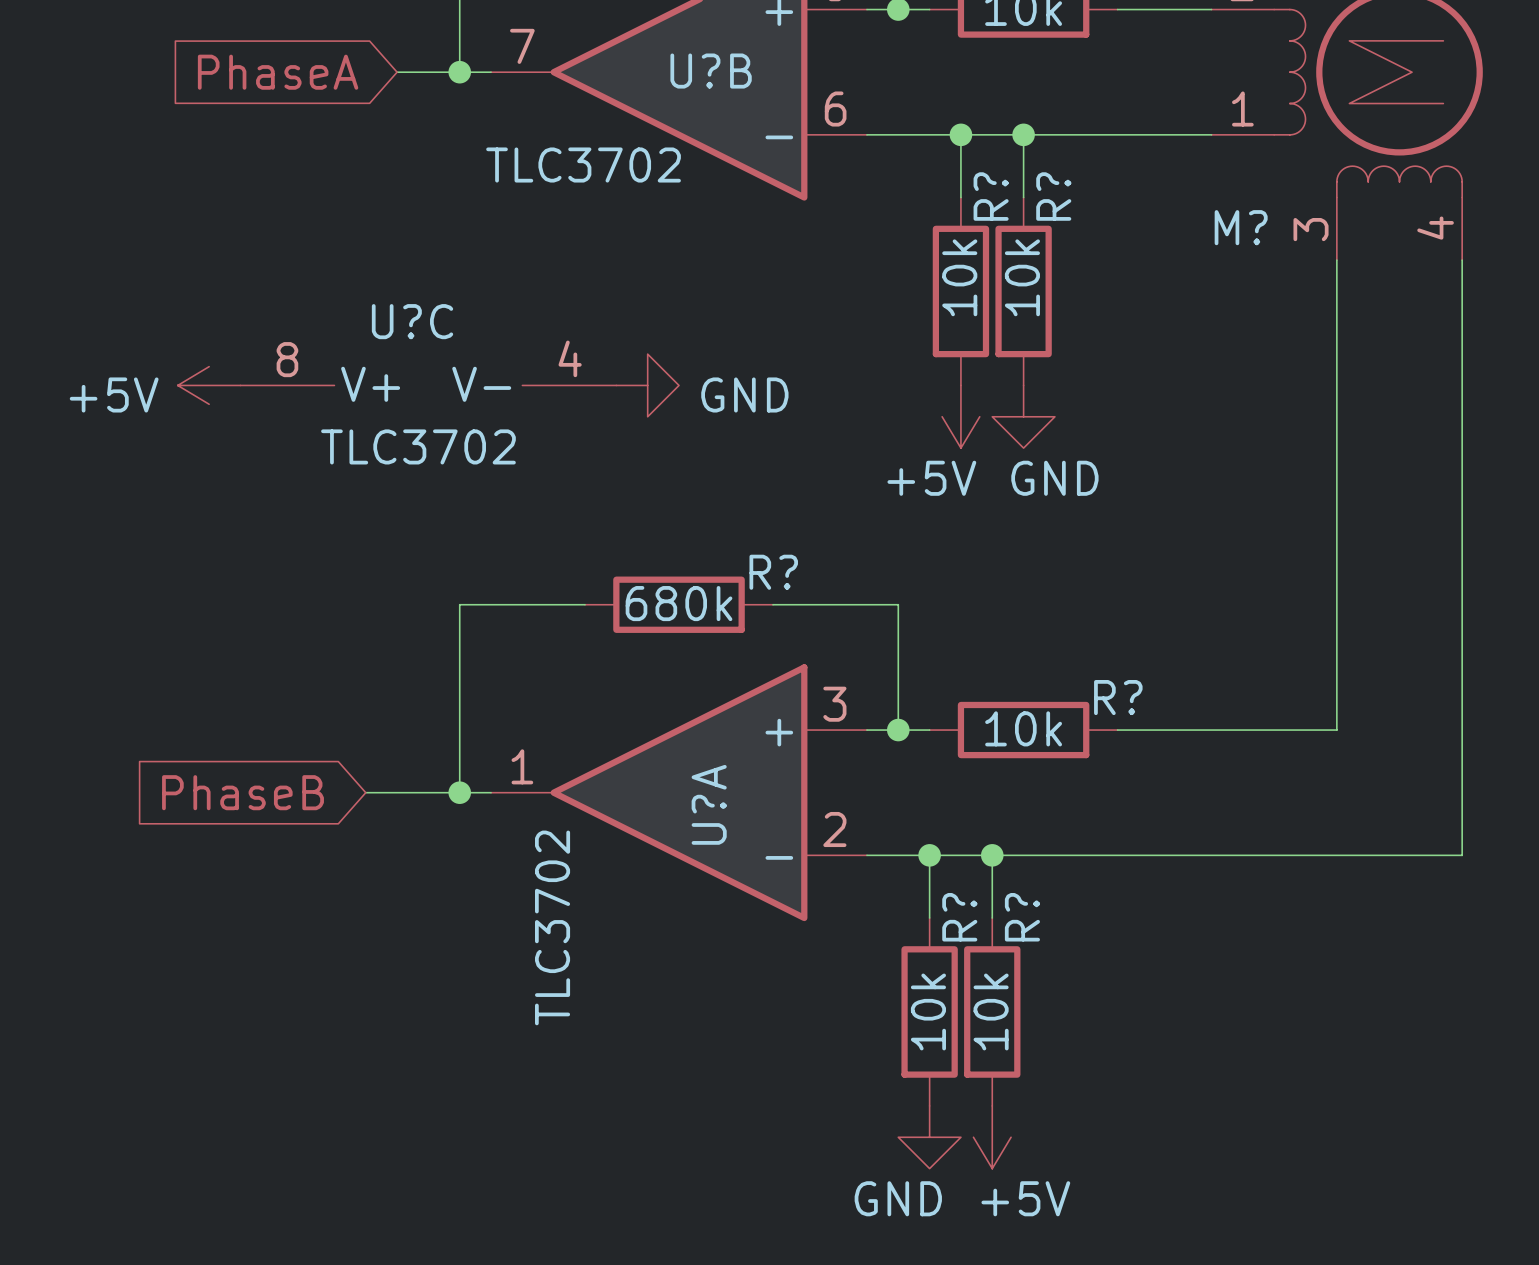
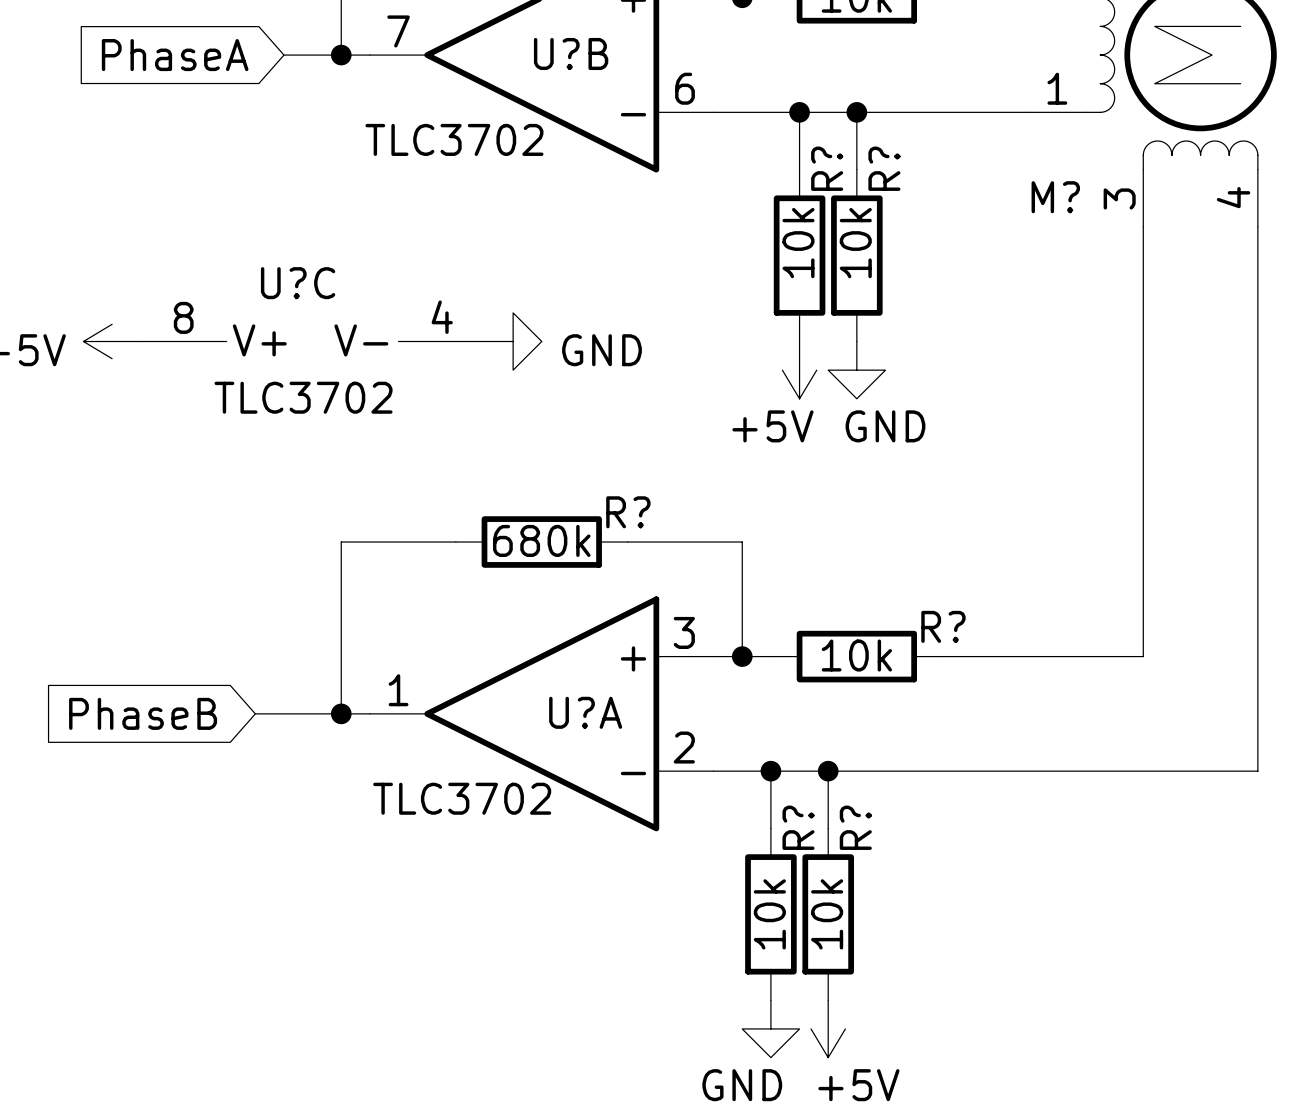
U?A name rotation: 0° (709, 804) -> 90° clockwise (585, 712)
U?A value rotation: 0° (552, 927) -> 90° clockwise (462, 798)

